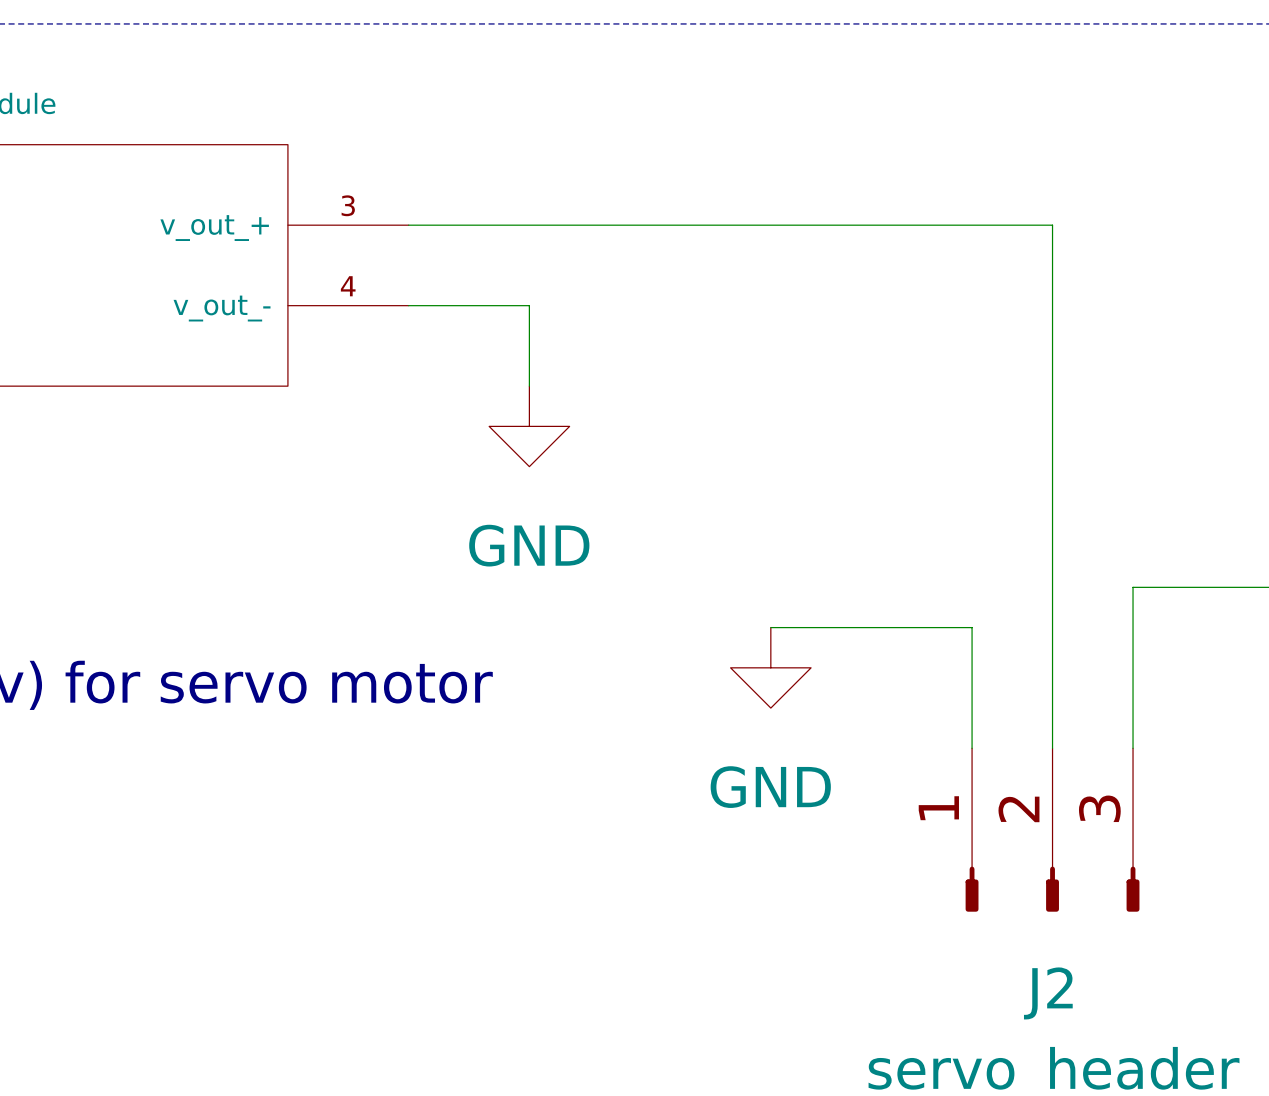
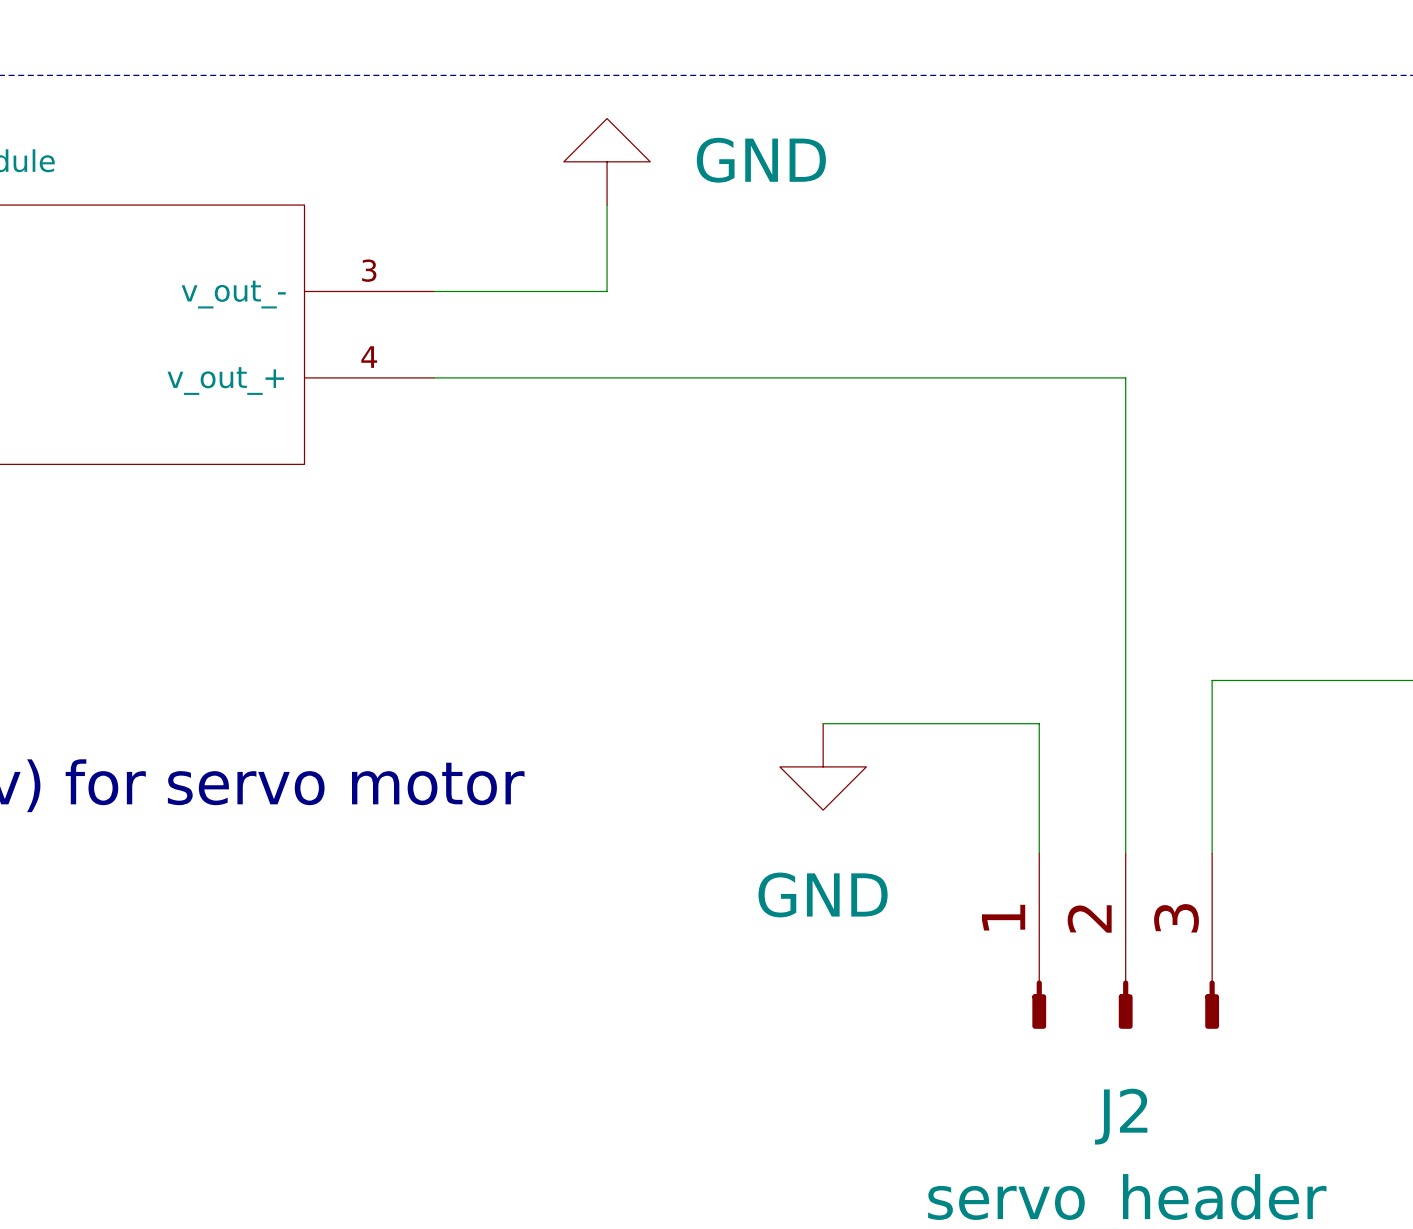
wire: (569, 225) (1052, 225) (1052, 305) -> (563, 377) (1125, 377)
part pin name: v_out_+ (214, 228) -> v_out_- (233, 294)
wire: (529, 305) (529, 386) -> (607, 205) (607, 291)
part pin name: v_out_- (222, 308) -> v_out_+ (225, 381)
power symbol rotation: 0° (529, 426) -> 180° (607, 161)
power symbol position: GND (529, 426) -> GND (607, 161)
power symbol text position: GND (529, 545) -> GND (761, 160)

